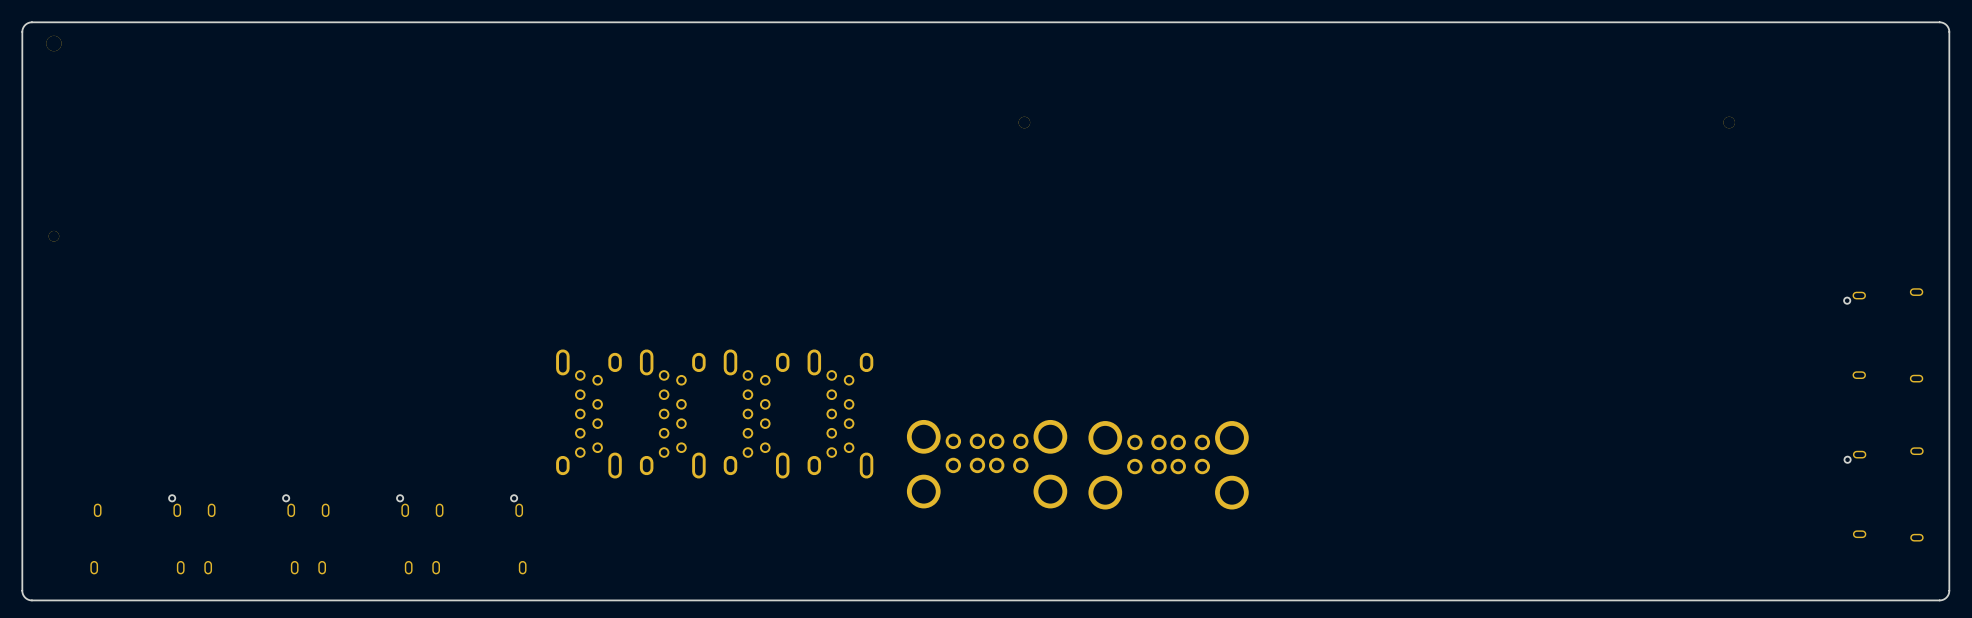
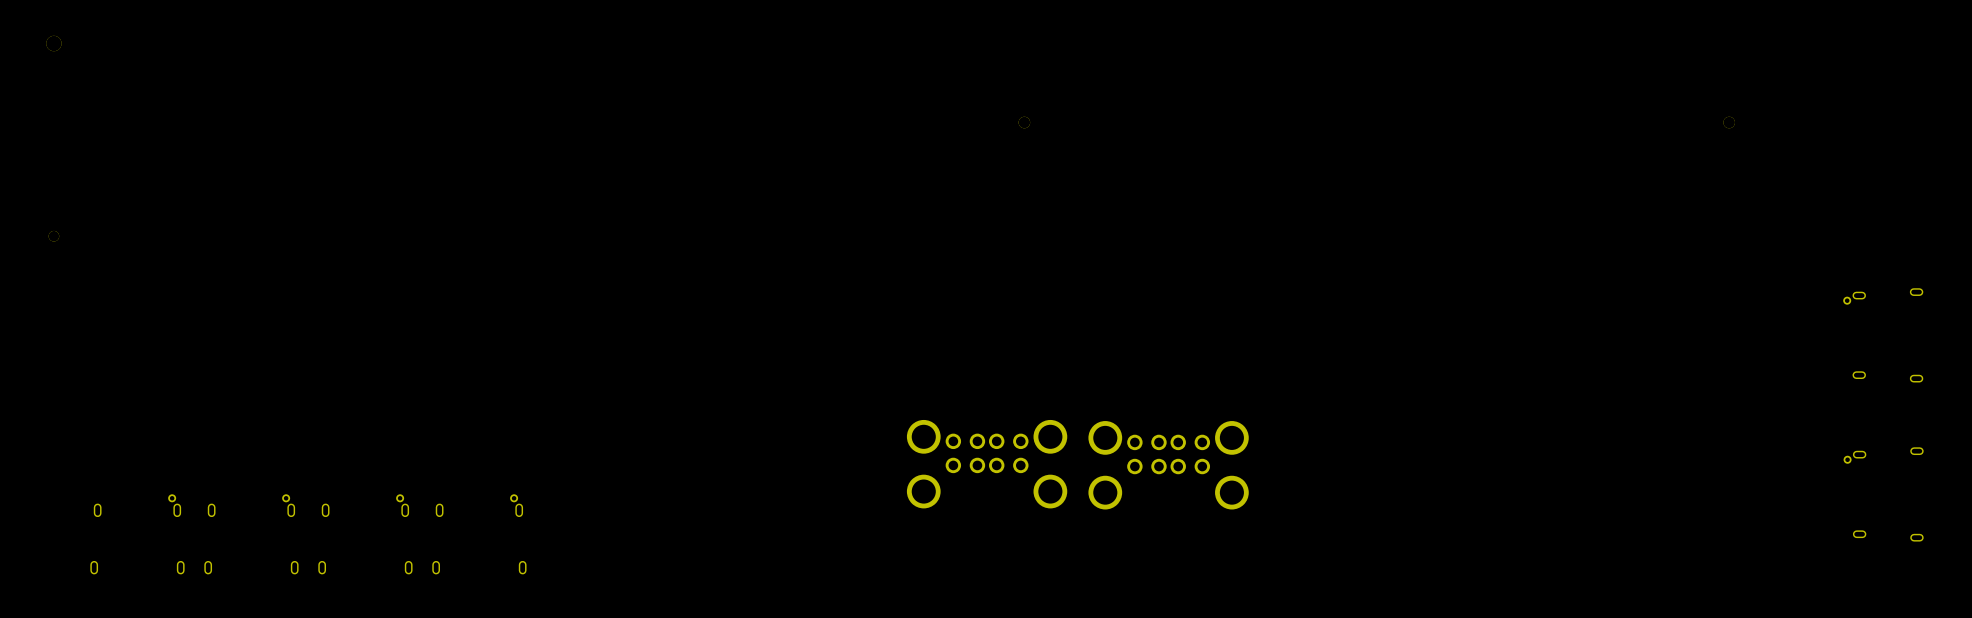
board edge: (1939, 22) (28, 22) (23, 26) (22, 31) (22, 593) (26, 598) (31, 600) (1942, 599) (1947, 596) (1949, 590) (1949, 31) (1946, 25) (1939, 22) -> none
part: (588, 413) -> none
part: (672, 413) -> none
part: (756, 413) -> none
part: (840, 413) -> none

